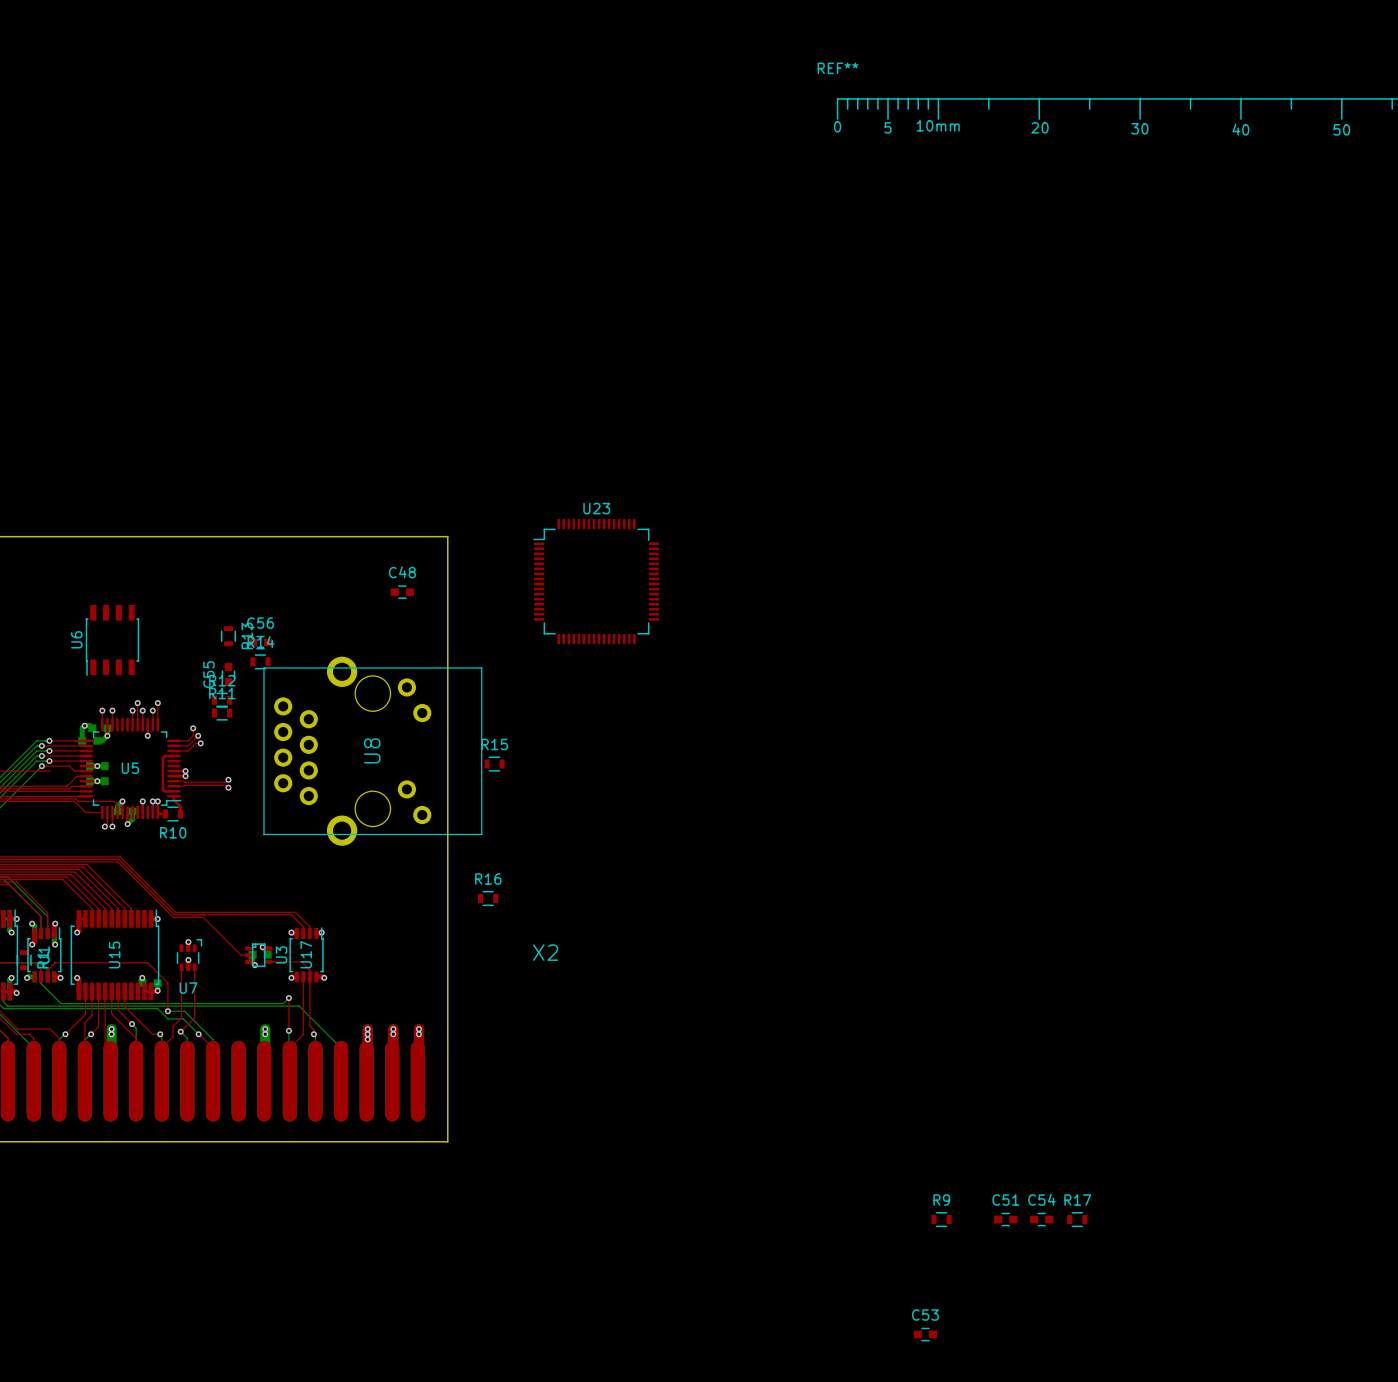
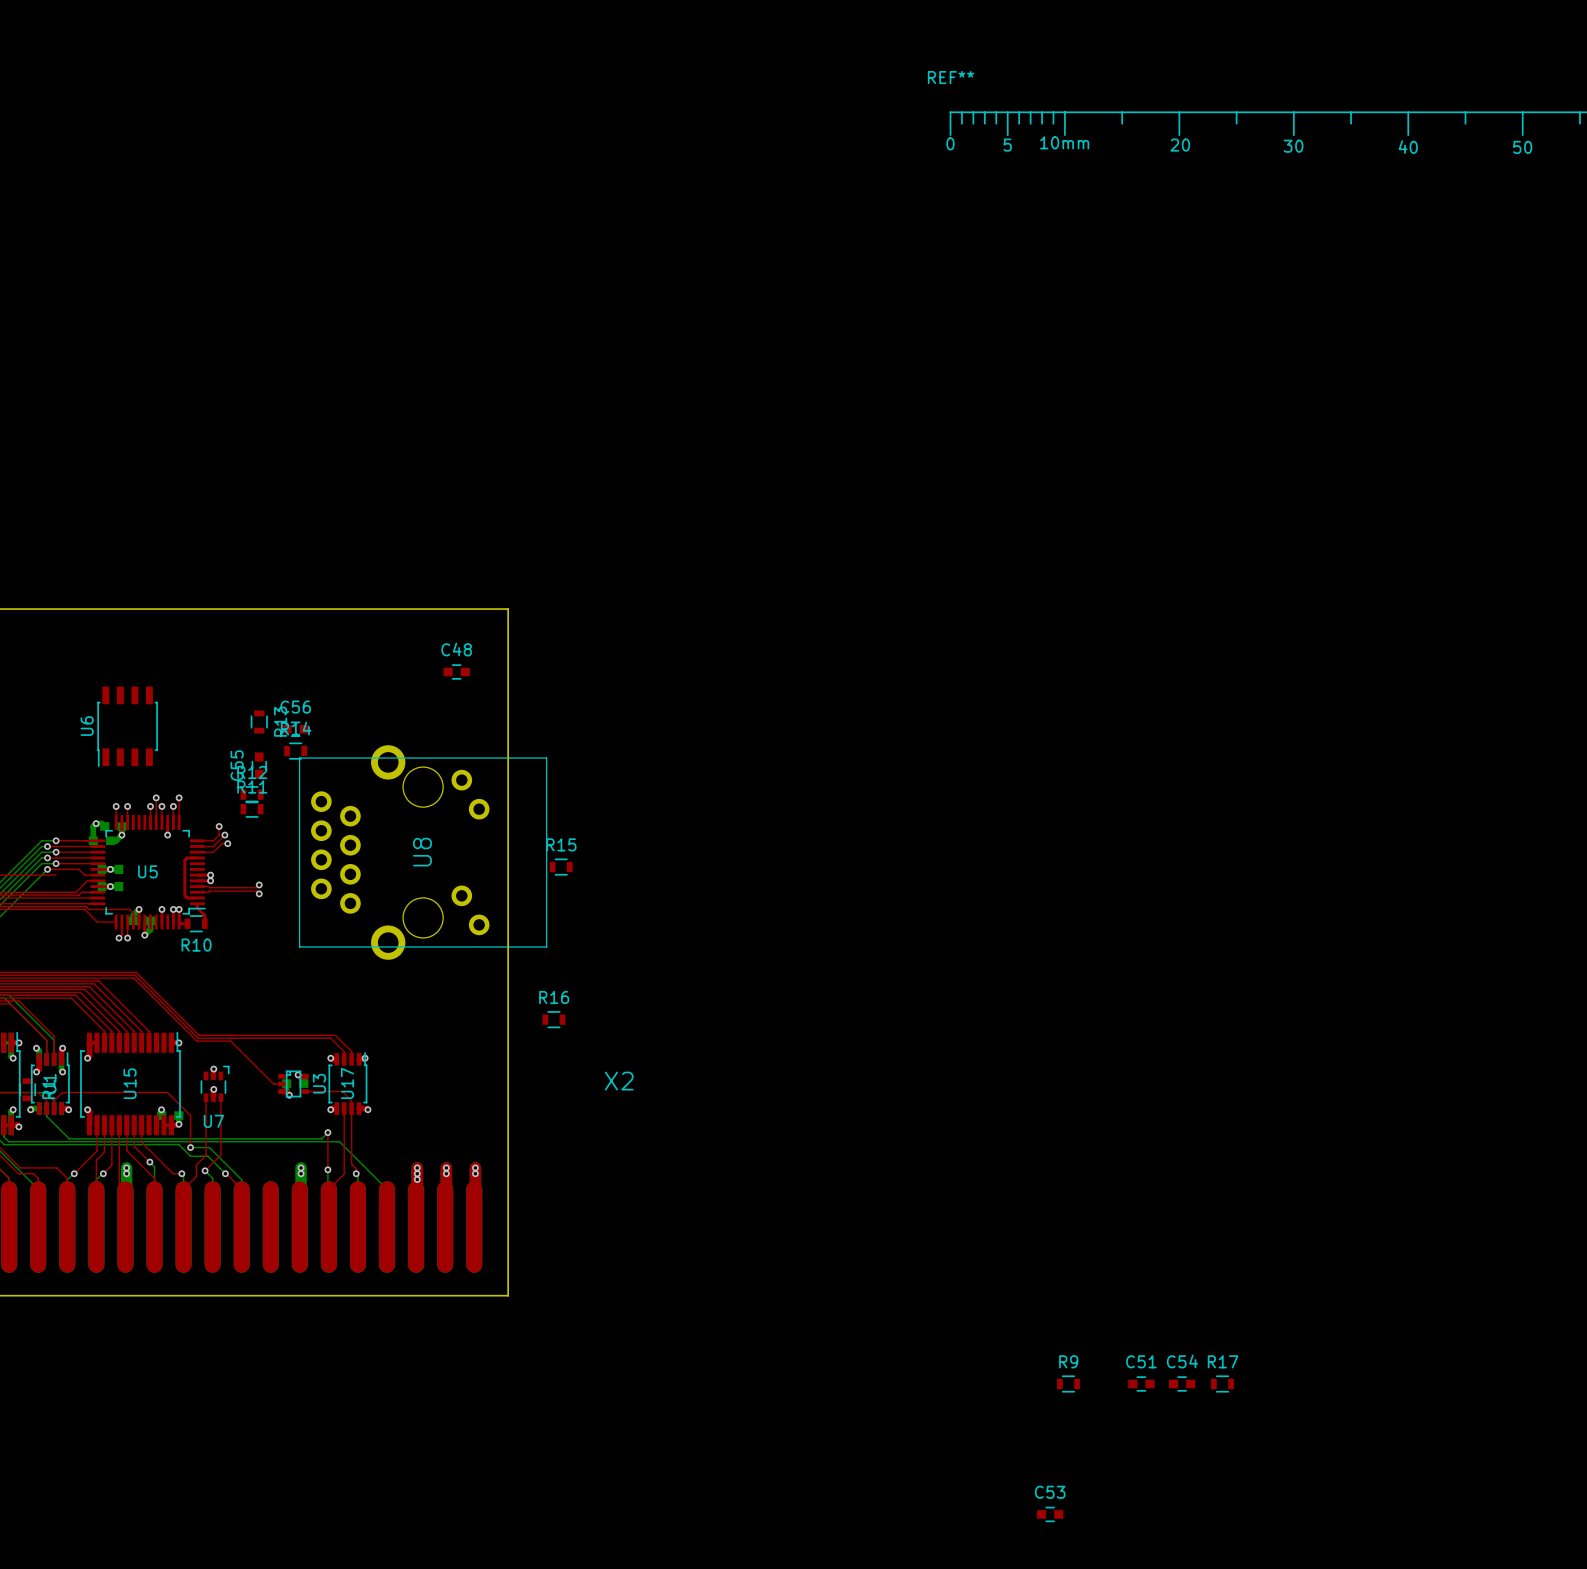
U23: (596, 581) -> none

